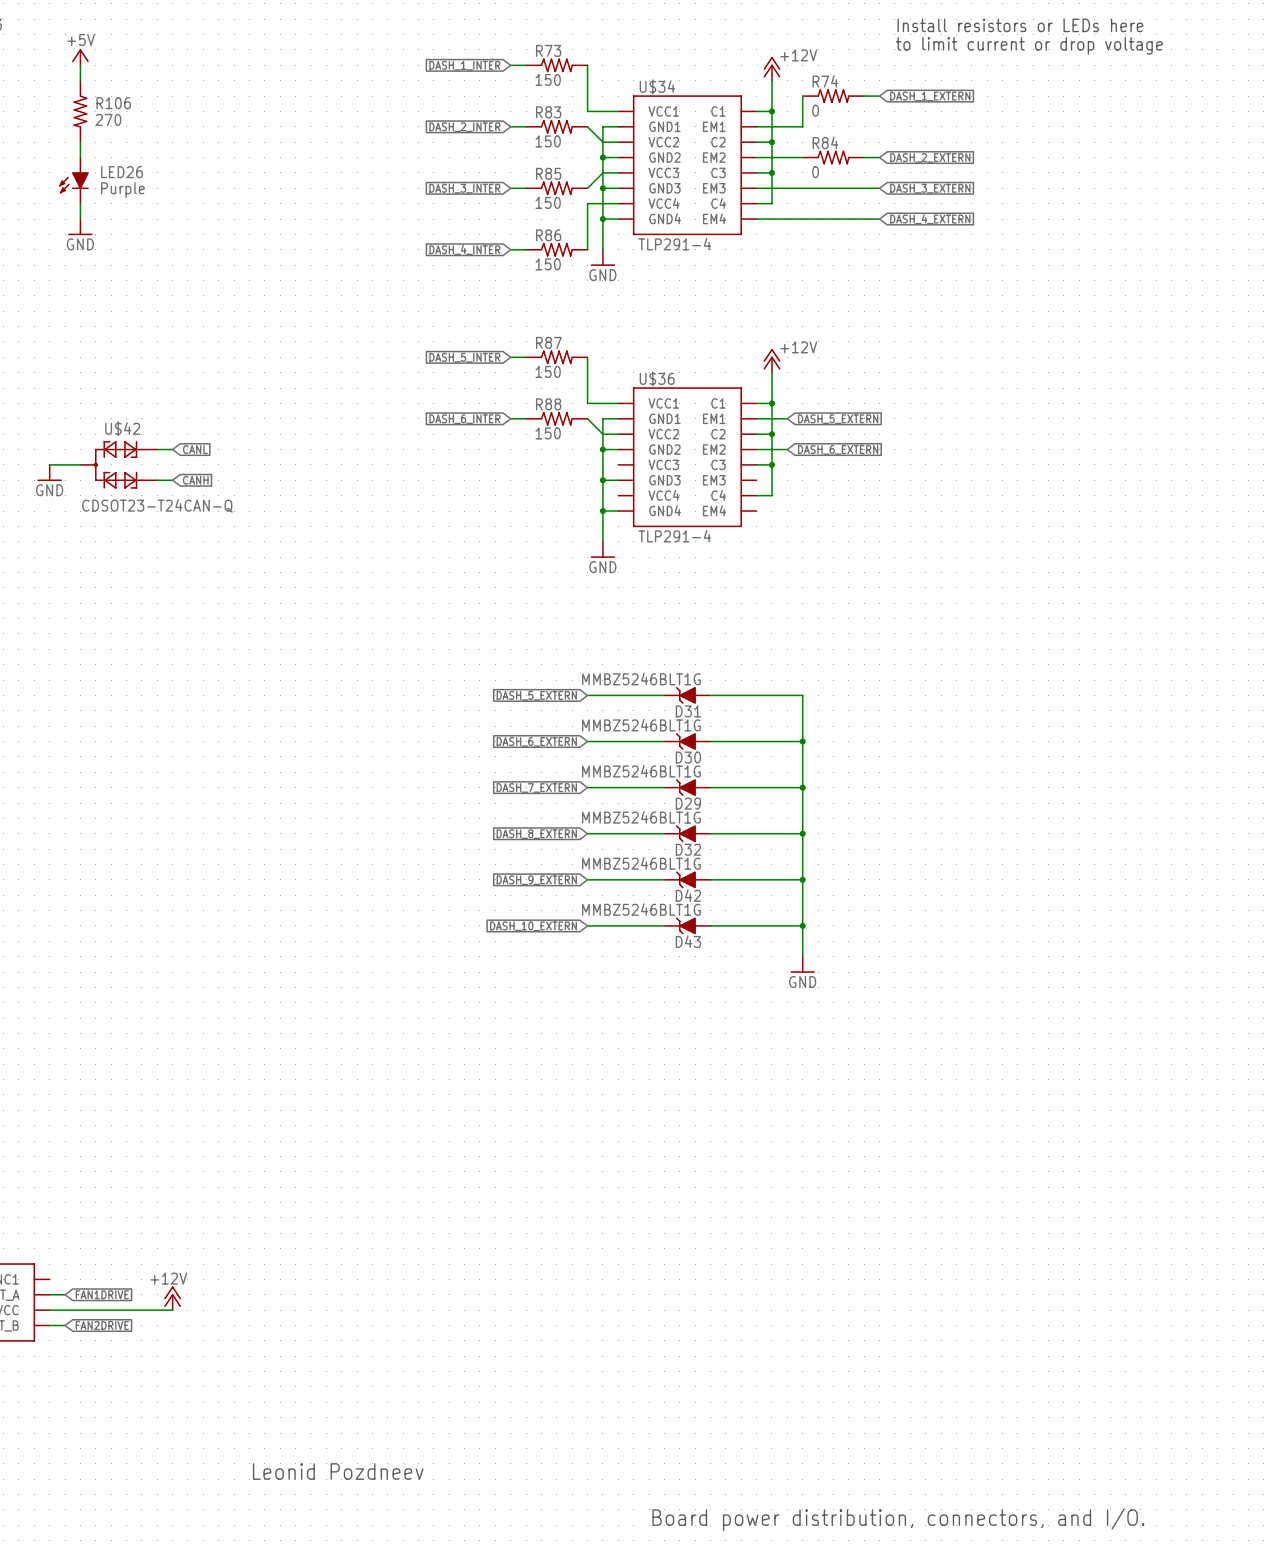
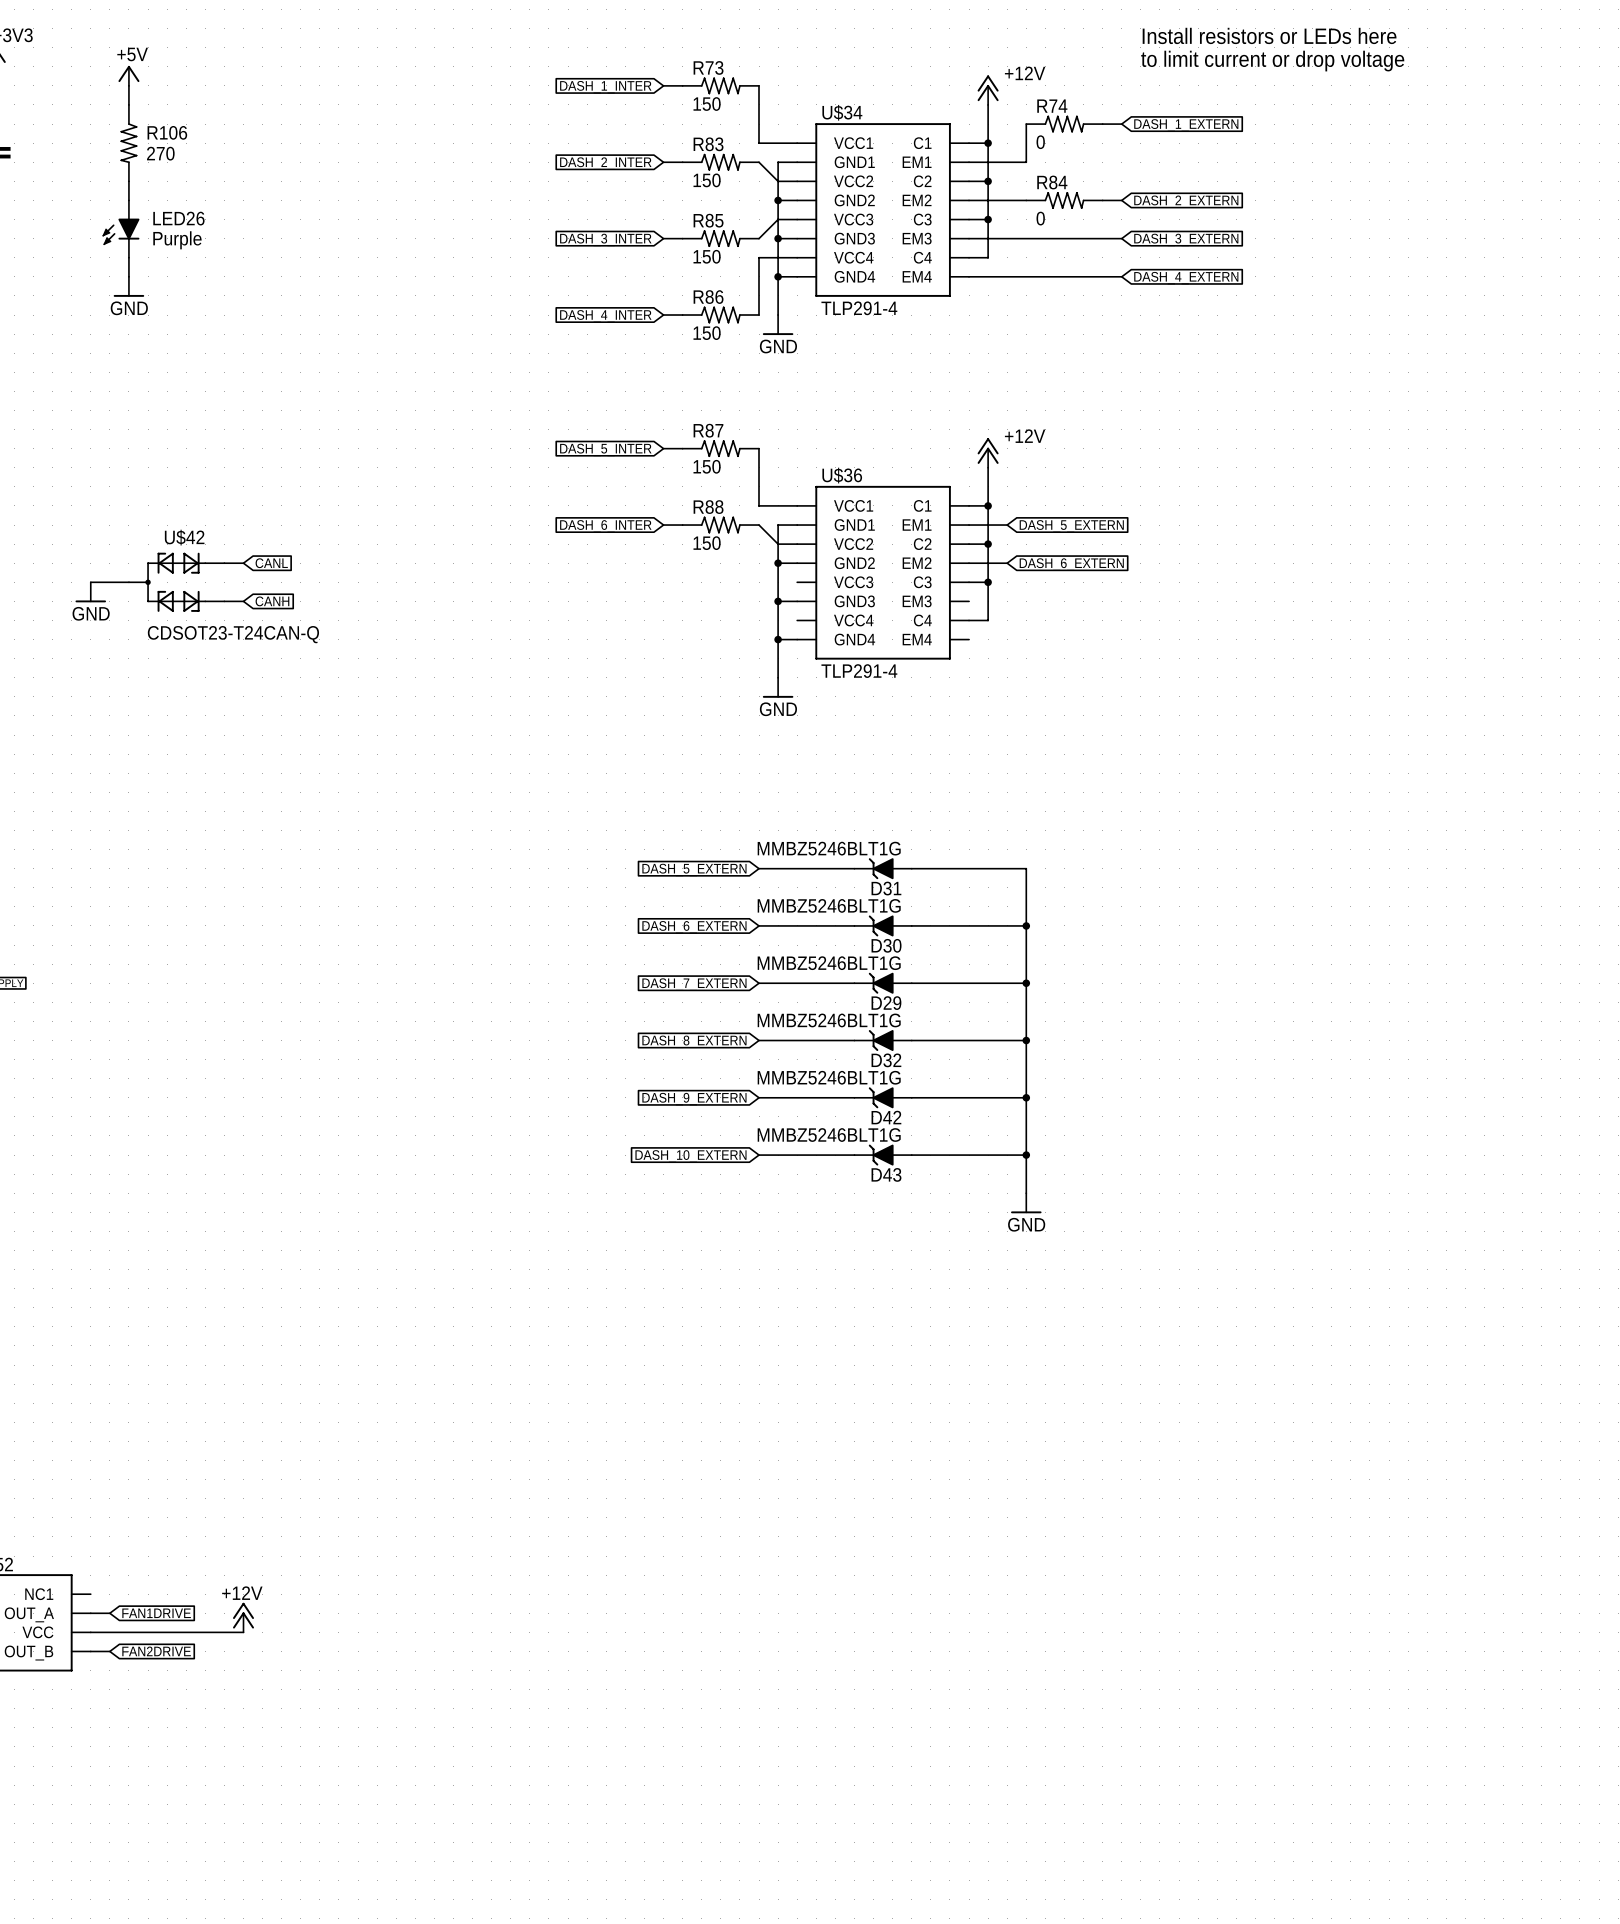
text: Leonid Pozdneev (338, 1471) -> none
text: Board power distribution, connectors, and I/O. (898, 1519) -> none

